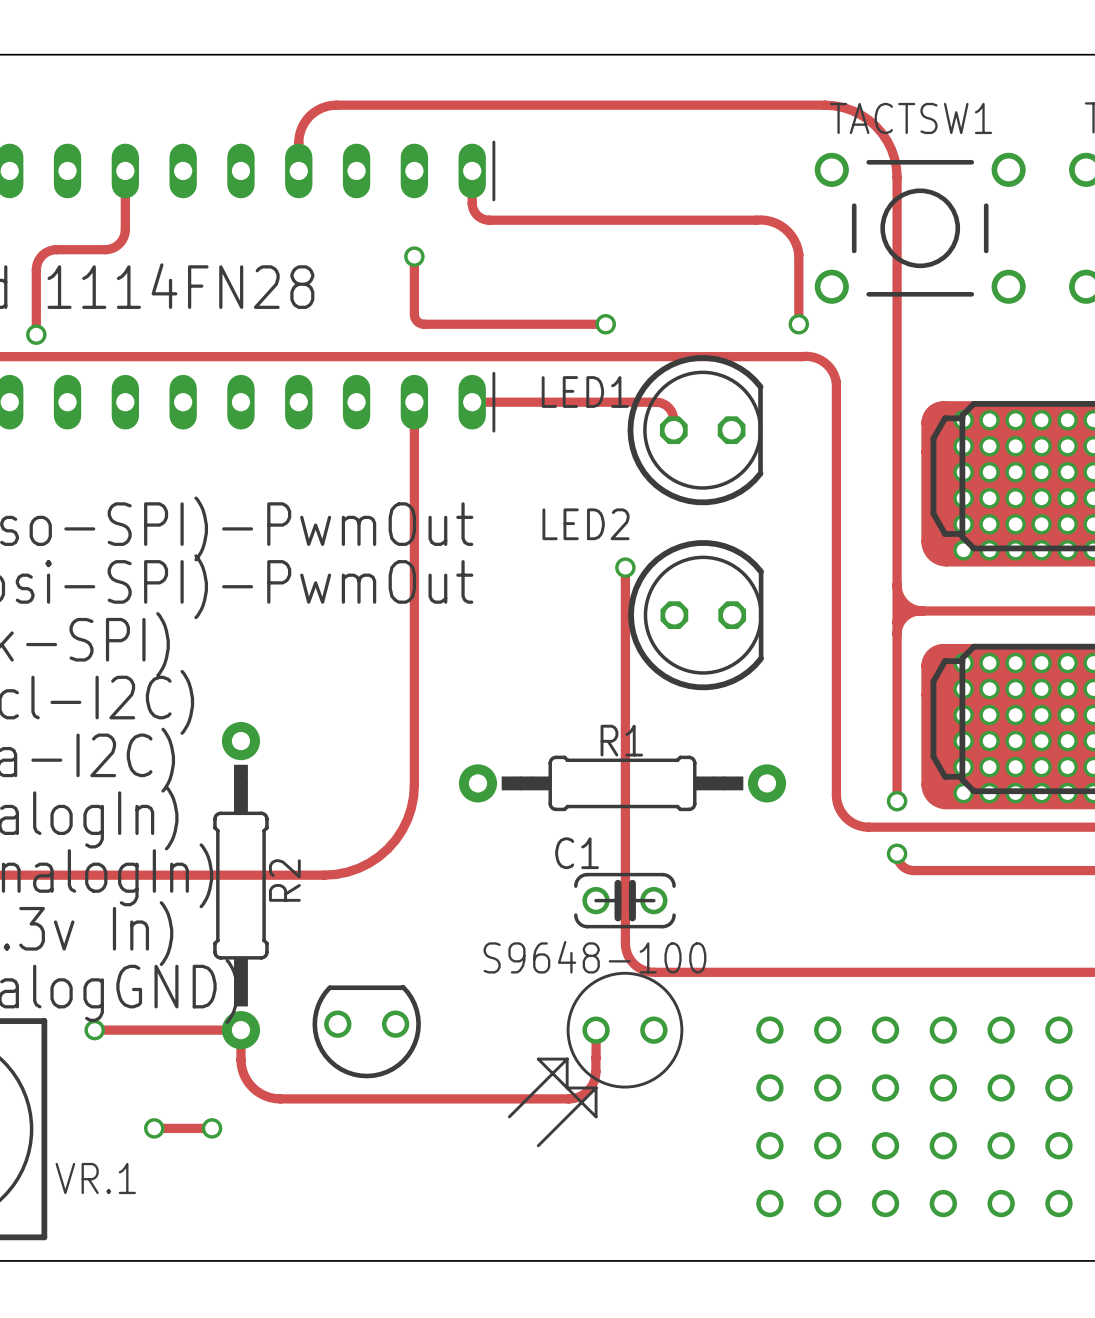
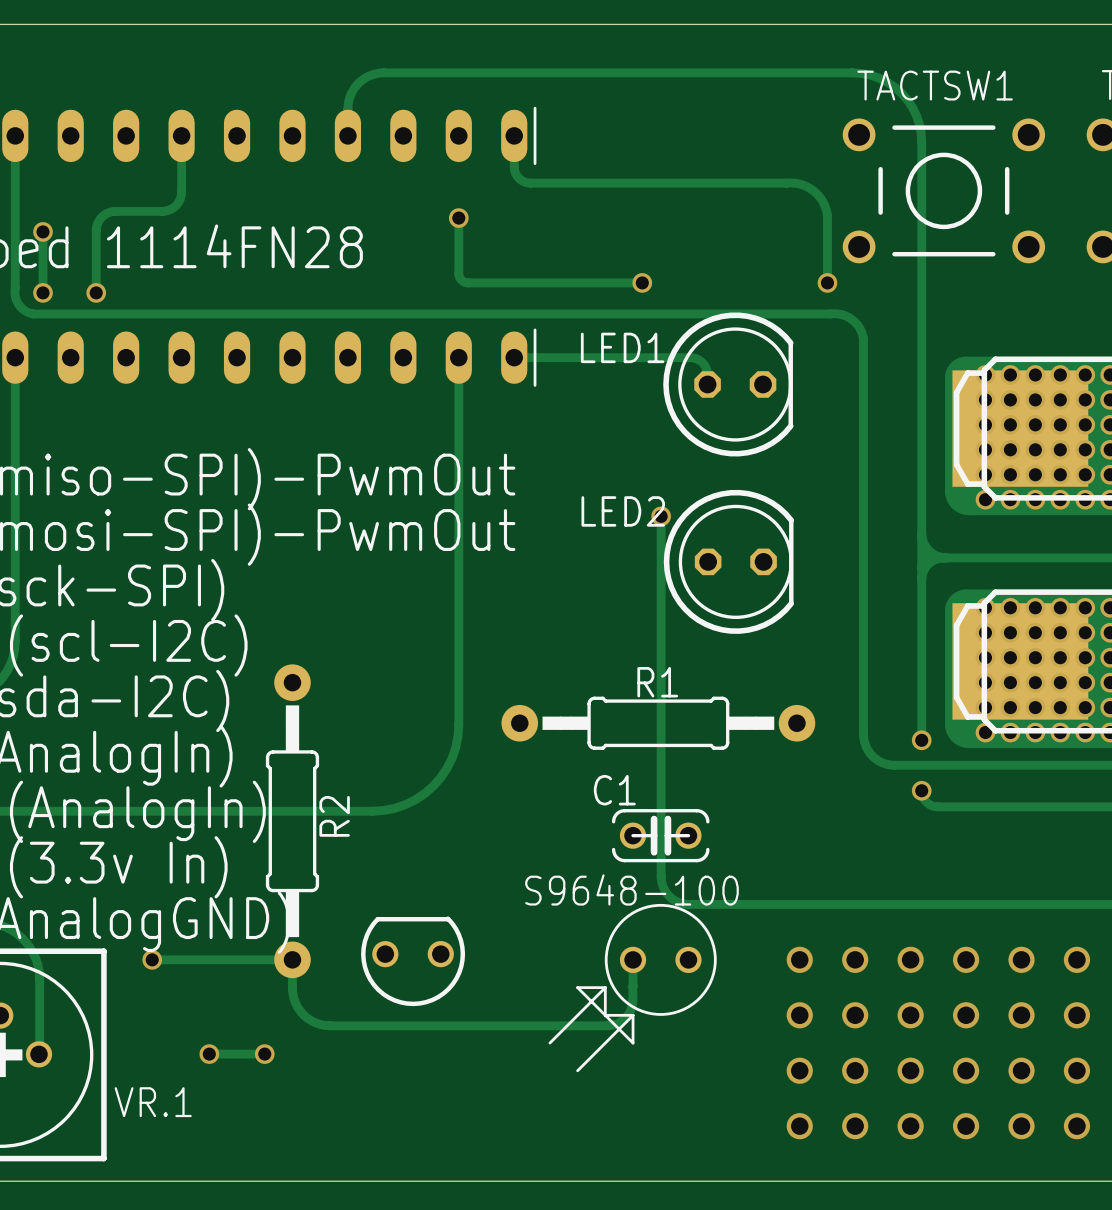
LED2 name position: LED2 (586, 524) -> LED2 (623, 511)

